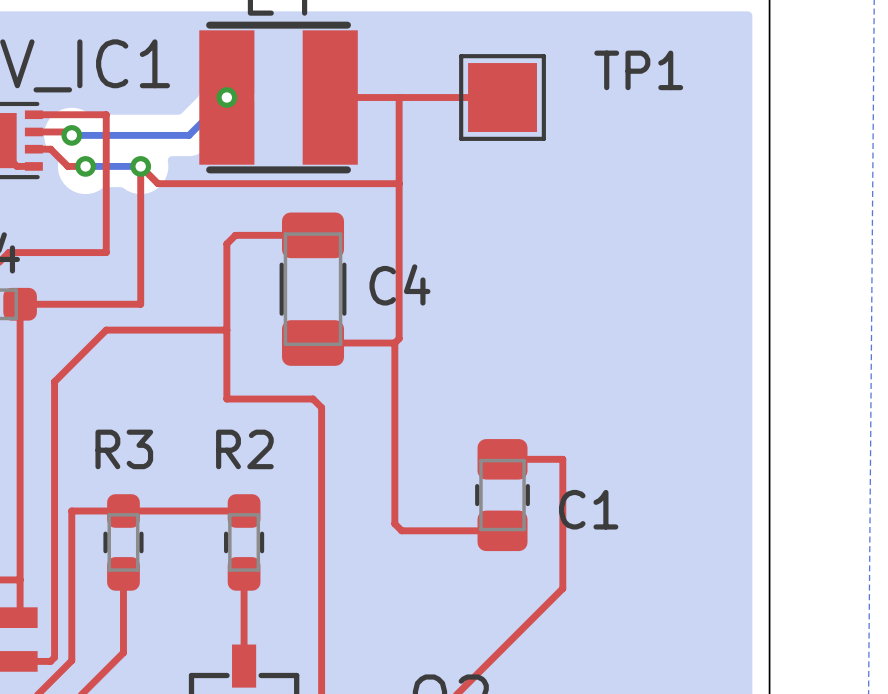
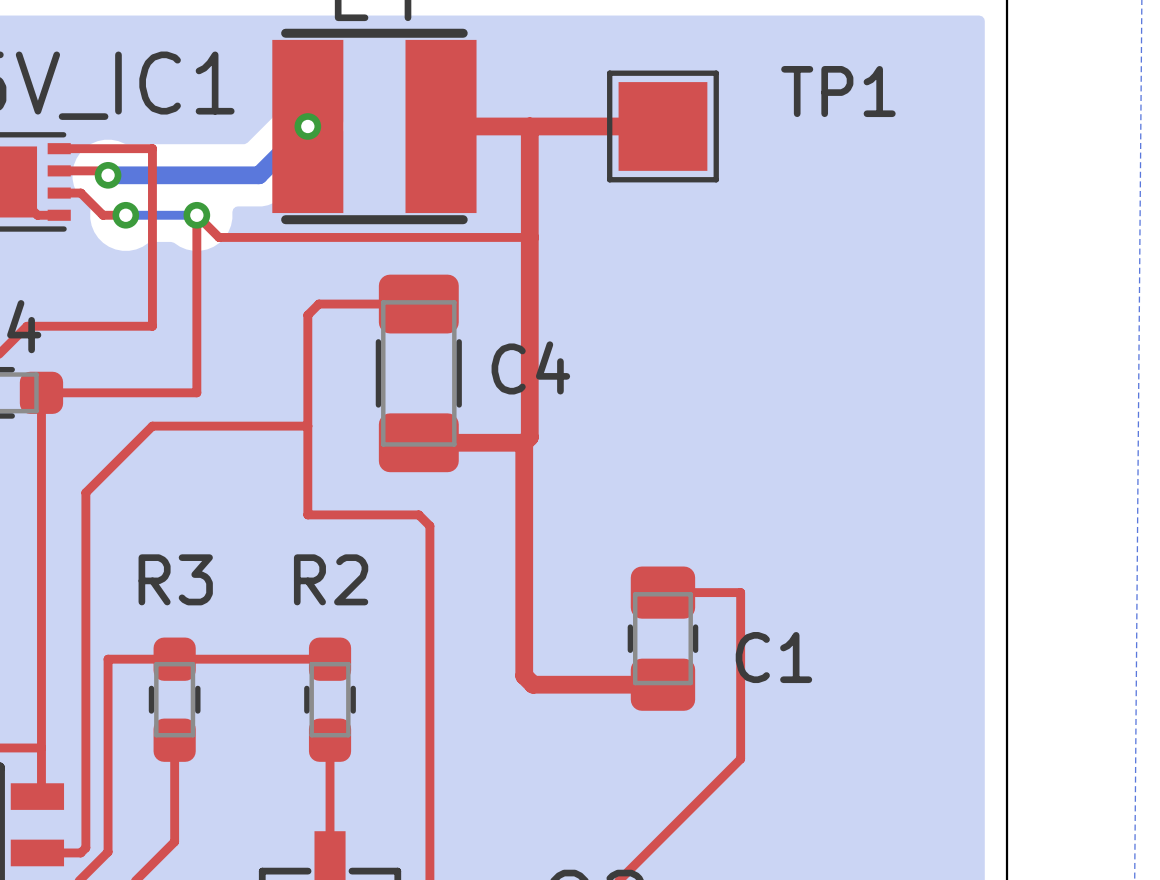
bottom track width: thin (226, 97) (188, 135) (71, 135) -> thick (307, 126) (258, 175) (108, 175)
top track width: thin (330, 97) (502, 97) -> thick (441, 126) (662, 126)
top track width: thin (399, 97) (399, 338) (394, 343) -> thick (529, 126) (529, 437) (524, 442)
top track width: thin (313, 343) (394, 343) -> thick (418, 442) (524, 442)
top track width: thin (394, 343) (394, 523) (401, 530) (502, 530) -> thick (524, 442) (524, 675) (533, 684) (662, 684)

